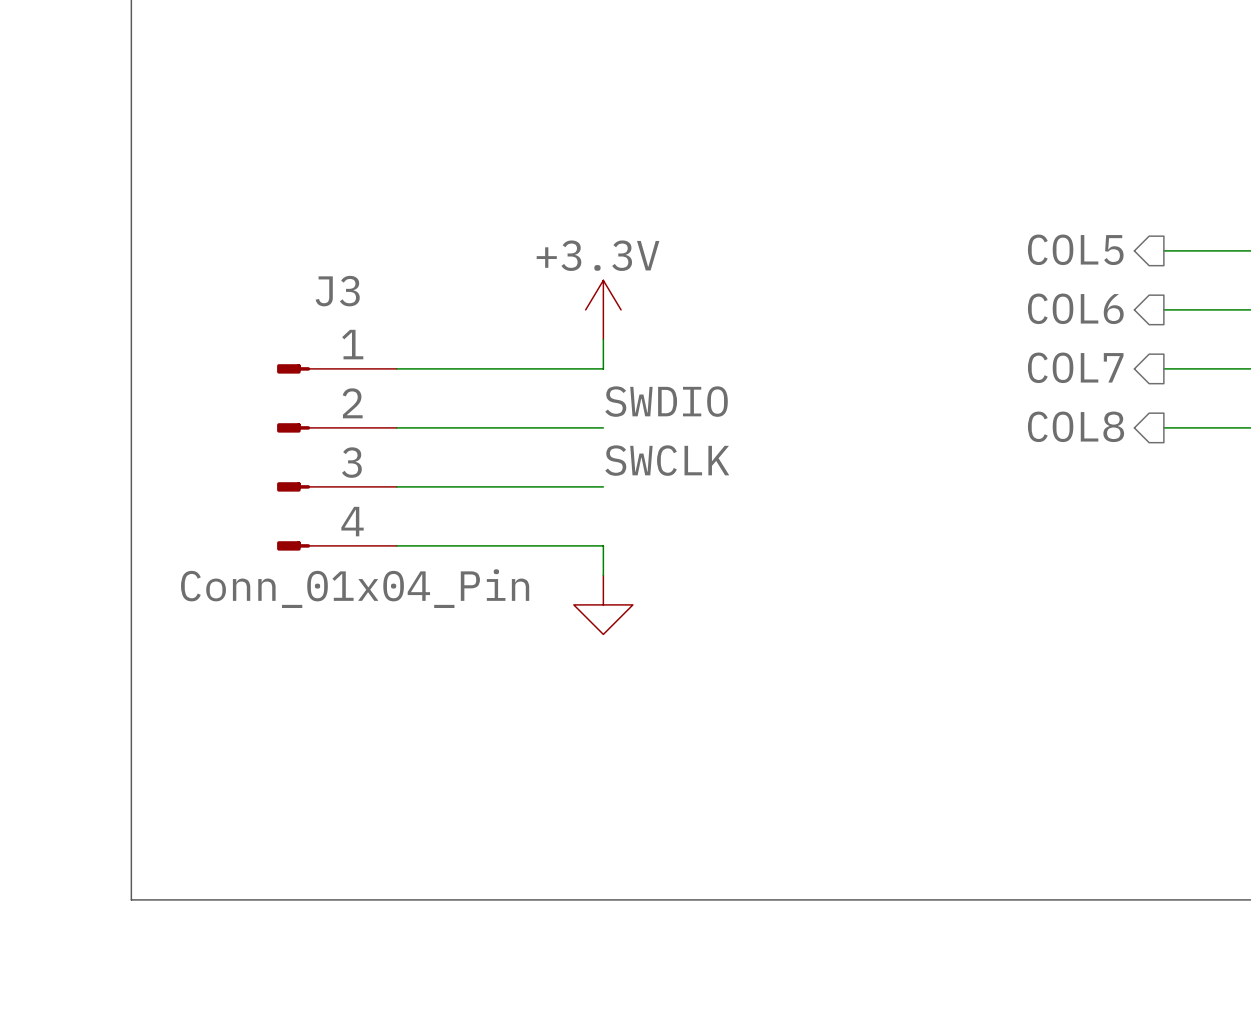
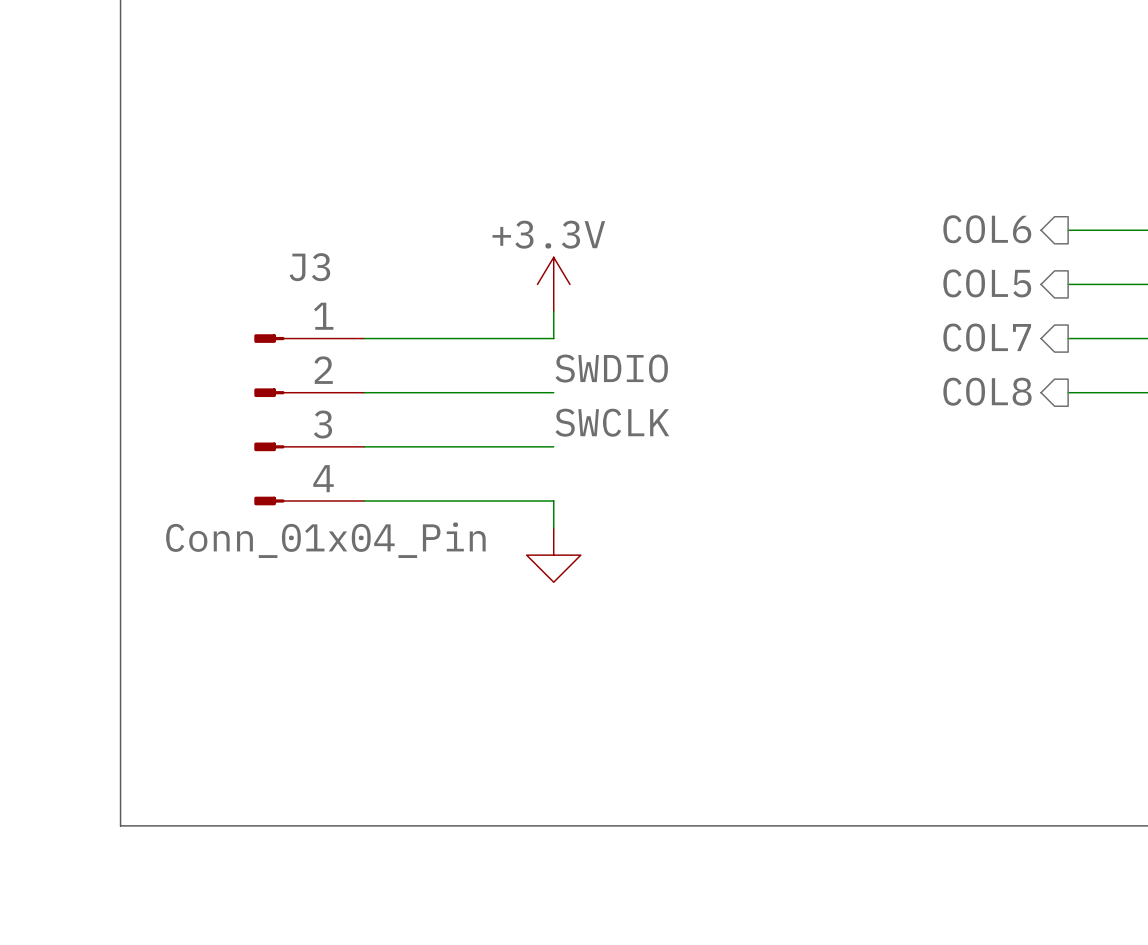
hierarchical label: COL5 (1075, 249) -> COL6 (987, 229)
hierarchical label: COL6 (1075, 308) -> COL5 (987, 283)

